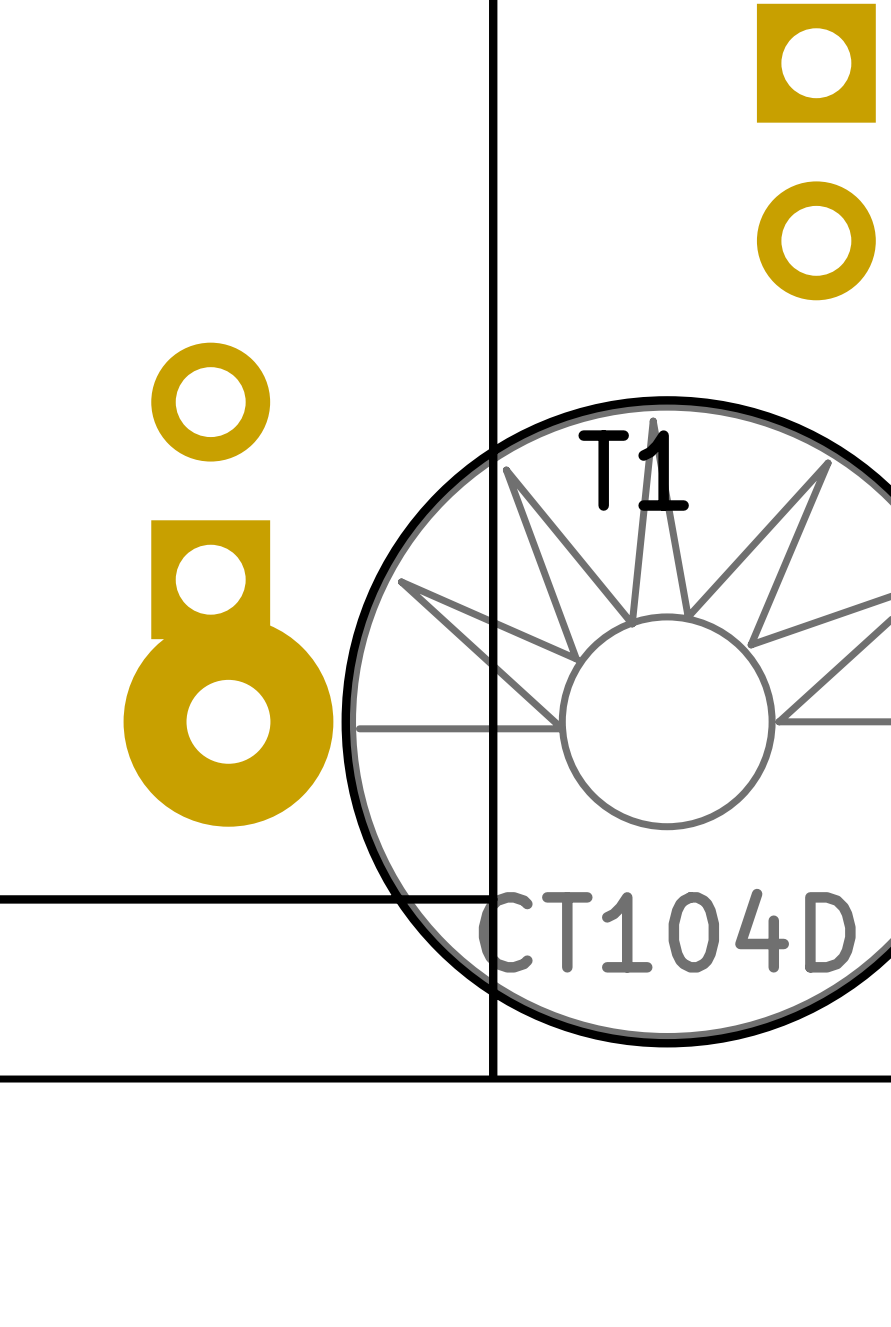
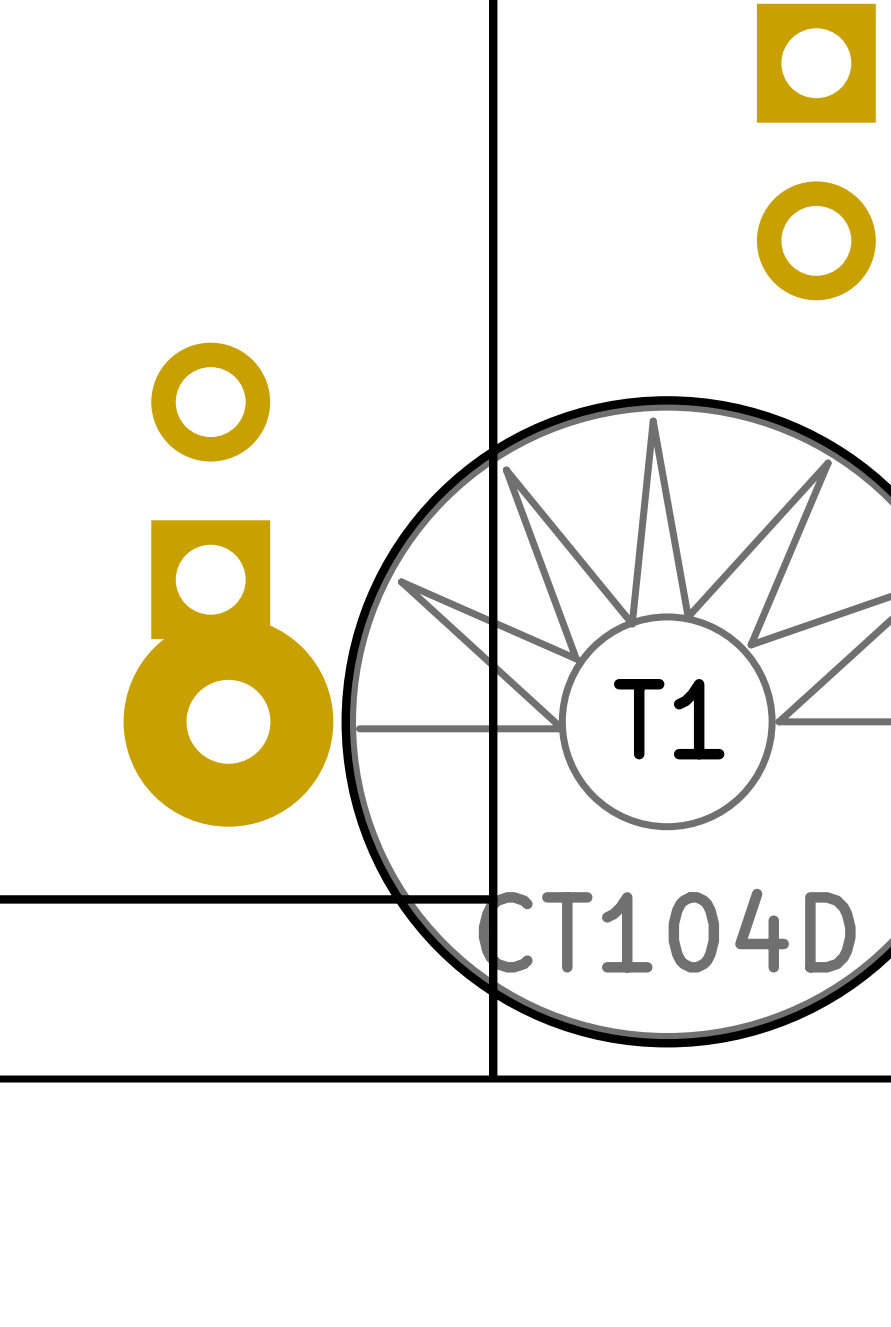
T1 name position: T1 (633, 470) -> T1 (669, 719)

